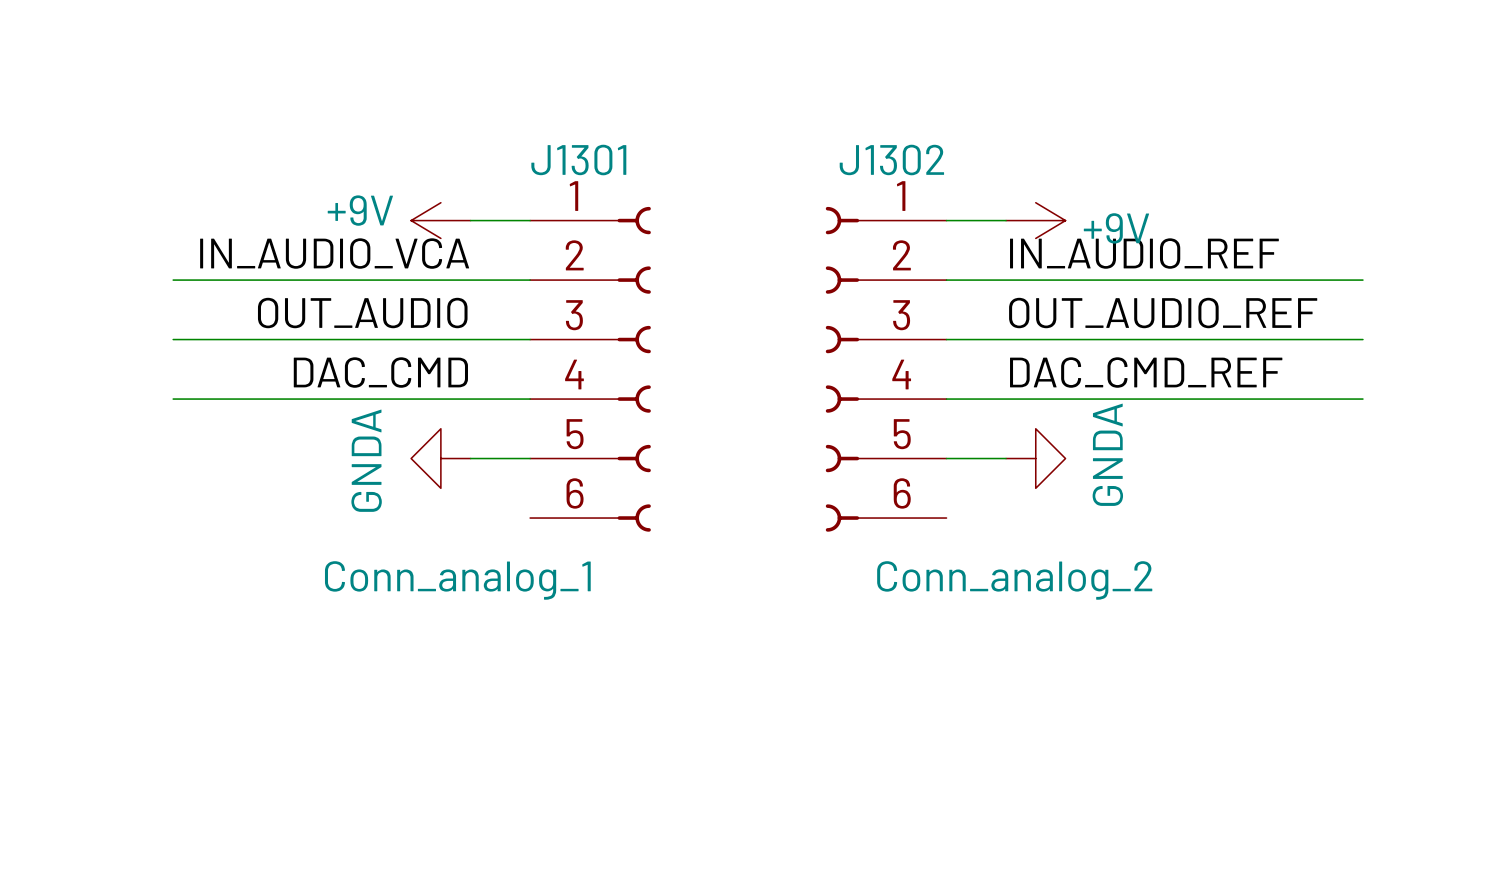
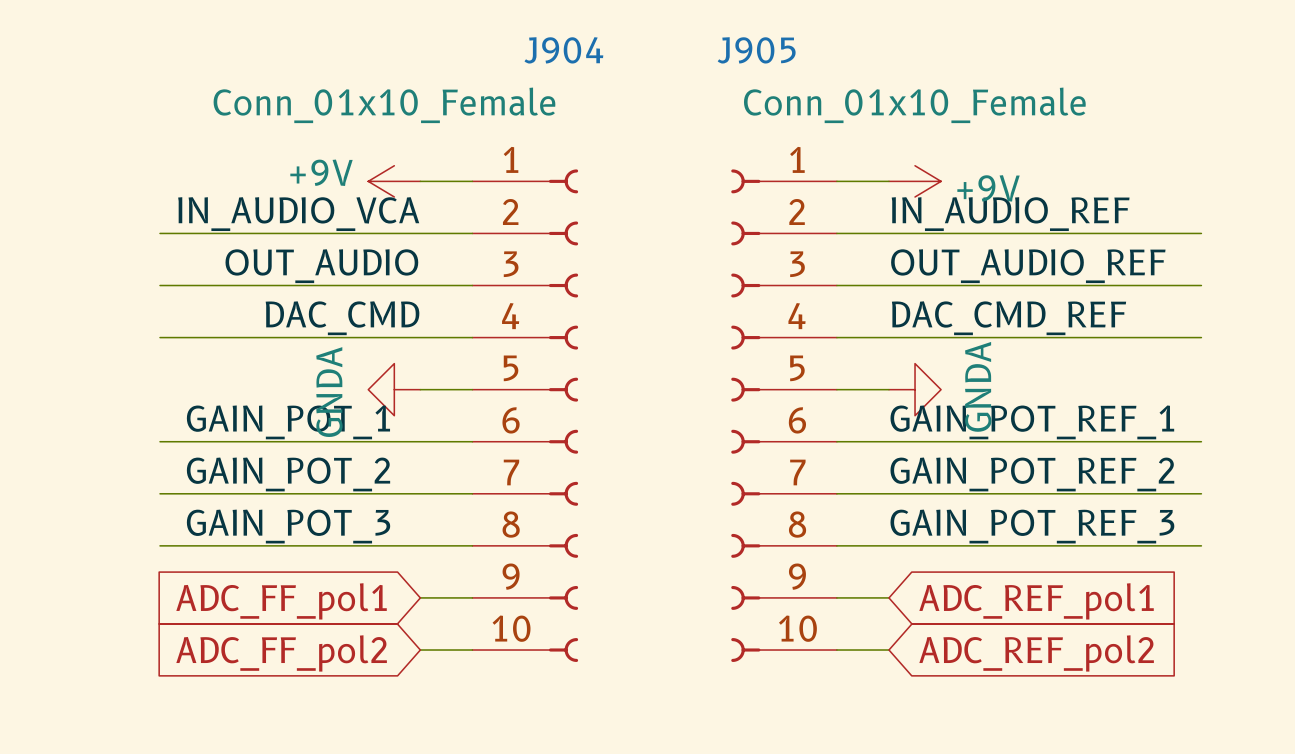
J1301: Conn_analog_1 (590, 369) -> none
J1302: Conn_analog_2 (886, 369) -> none
J904: none -> Conn_01x10_Female (525, 415)
J905: none -> Conn_01x10_Female (784, 415)
label: none -> GAIN_POT_1 (288, 422)
label: none -> GAIN_POT_REF_1 (1032, 422)
wire: none -> (160, 441) (472, 441)
wire: none -> (836, 441) (1201, 441)
label: none -> GAIN_POT_2 (288, 474)
label: none -> GAIN_POT_REF_2 (1032, 474)
wire: none -> (160, 493) (472, 493)
wire: none -> (836, 493) (1201, 493)
label: none -> GAIN_POT_3 (288, 526)
label: none -> GAIN_POT_REF_3 (1032, 526)
wire: none -> (160, 545) (472, 545)
wire: none -> (836, 545) (1201, 545)
wire: none -> (420, 597) (472, 597)
wire: none -> (836, 597) (888, 597)
global label: none -> ADC_FF_pol1 (281, 601)
global label: none -> ADC_REF_pol1 (1036, 601)
wire: none -> (420, 650) (472, 650)
wire: none -> (836, 650) (888, 650)
global label: none -> ADC_FF_pol2 (281, 653)
global label: none -> ADC_REF_pol2 (1036, 653)

